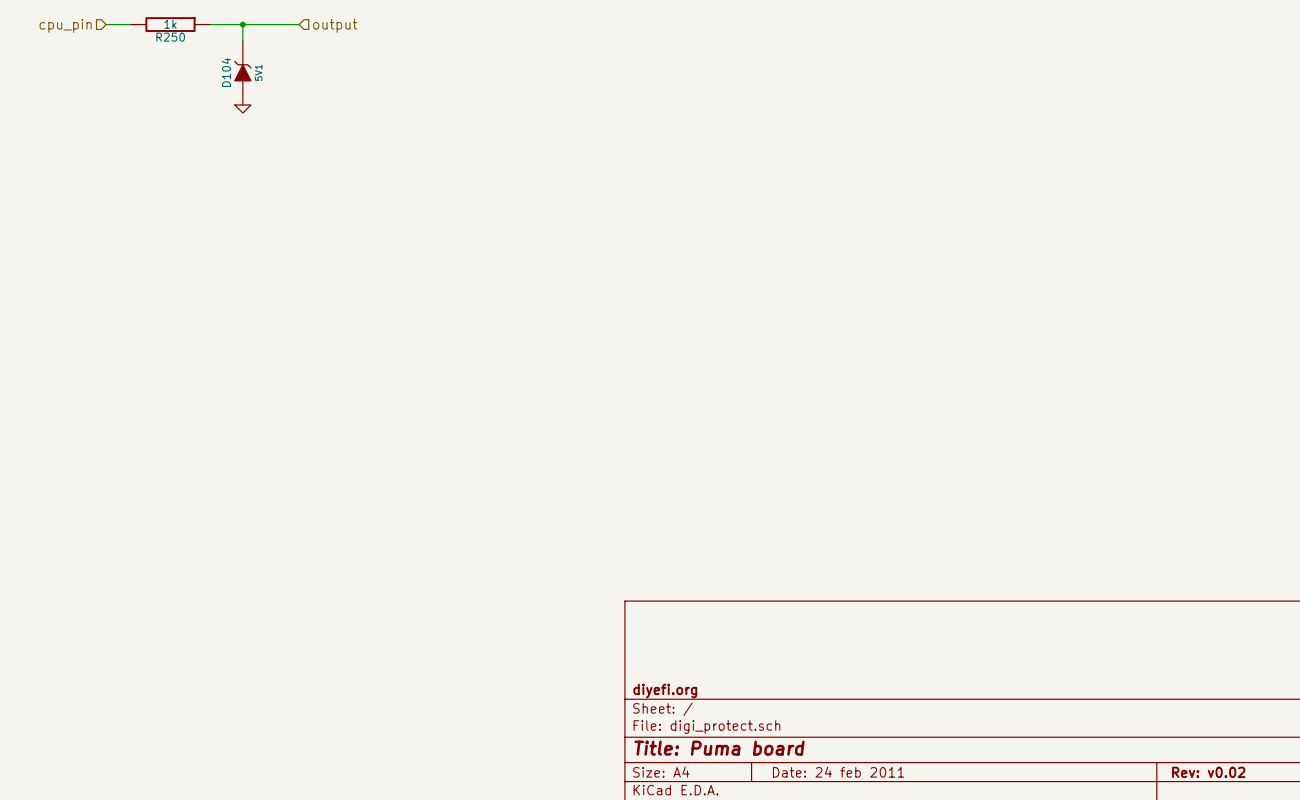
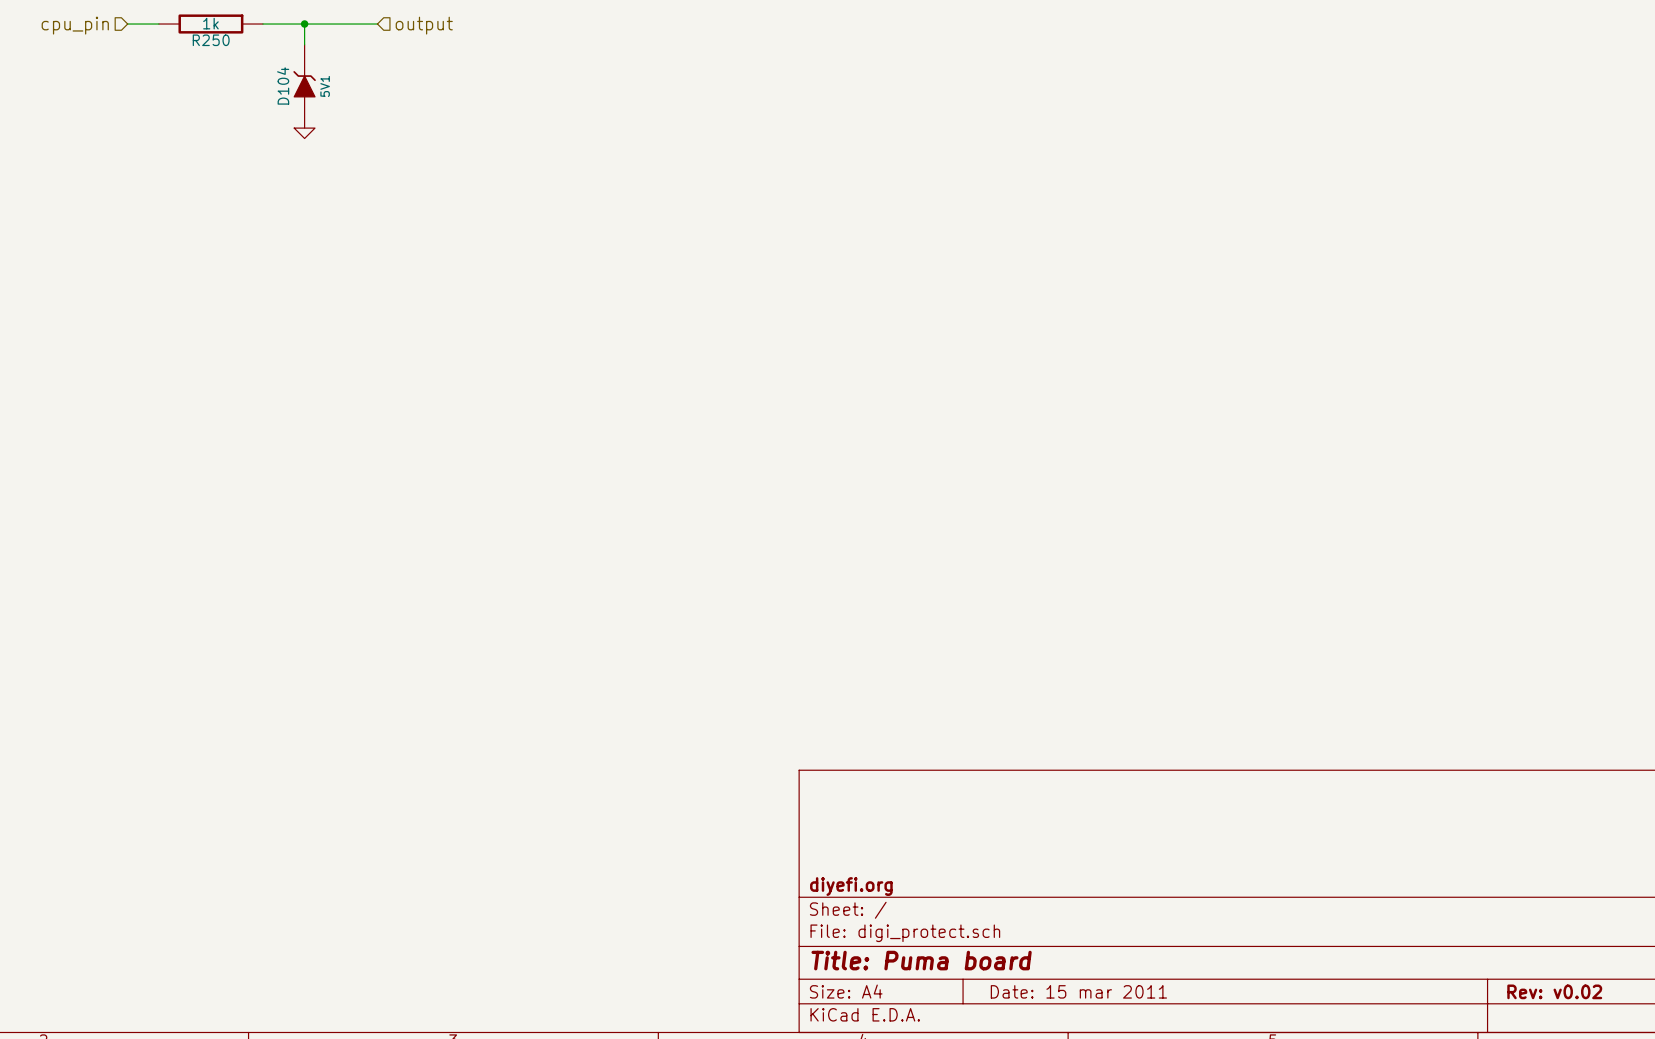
title block: Date: 24 feb 2011 (838, 772) -> Date: 15 mar 2011 (1078, 991)

